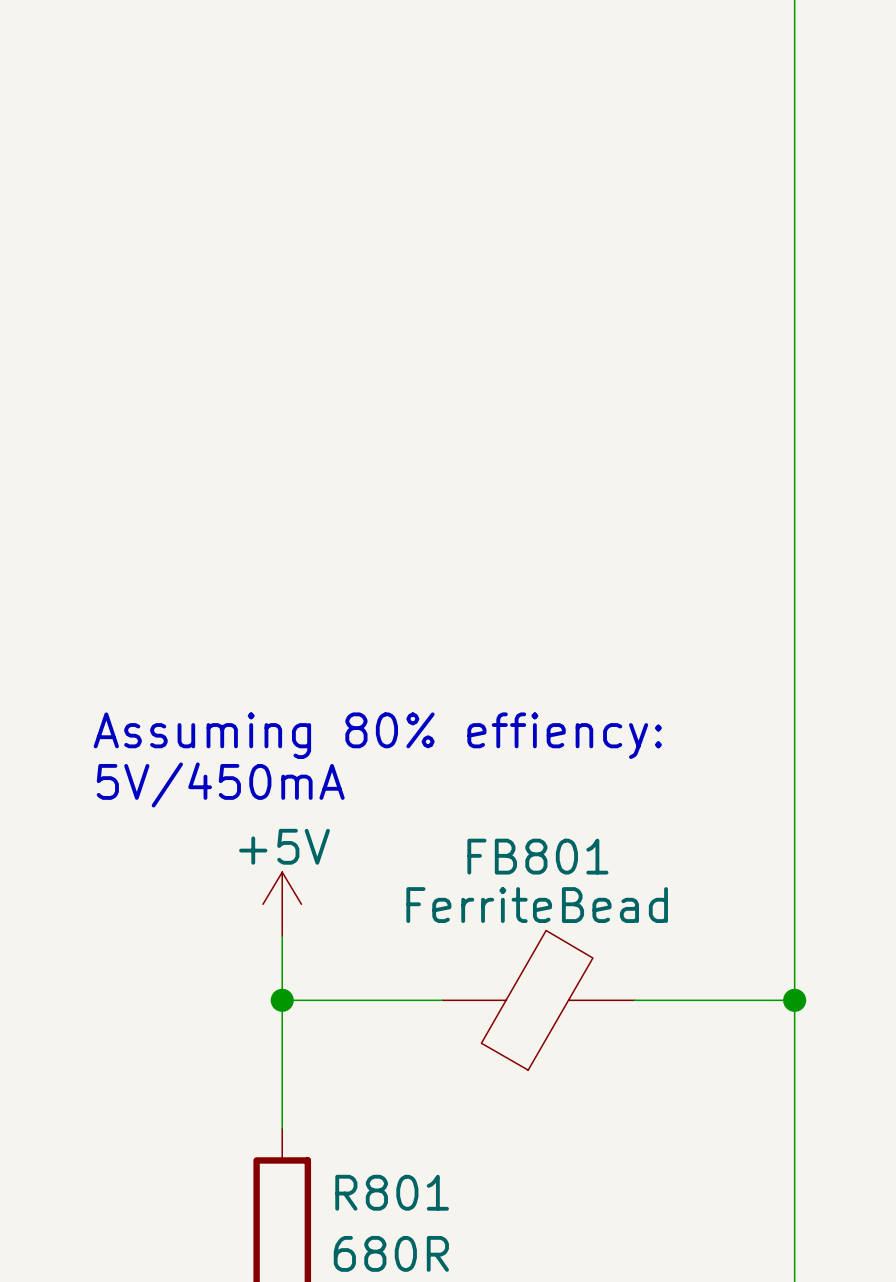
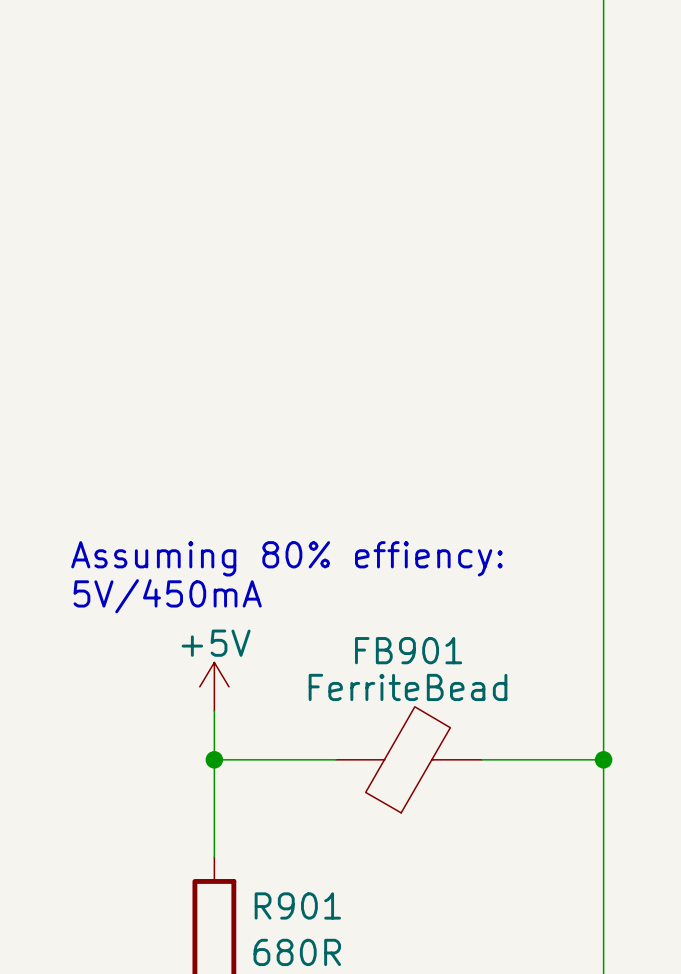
FB801 name: FB801 (537, 856) -> FB901 (408, 650)
R801 name: R801 (392, 1192) -> R901 (297, 905)

